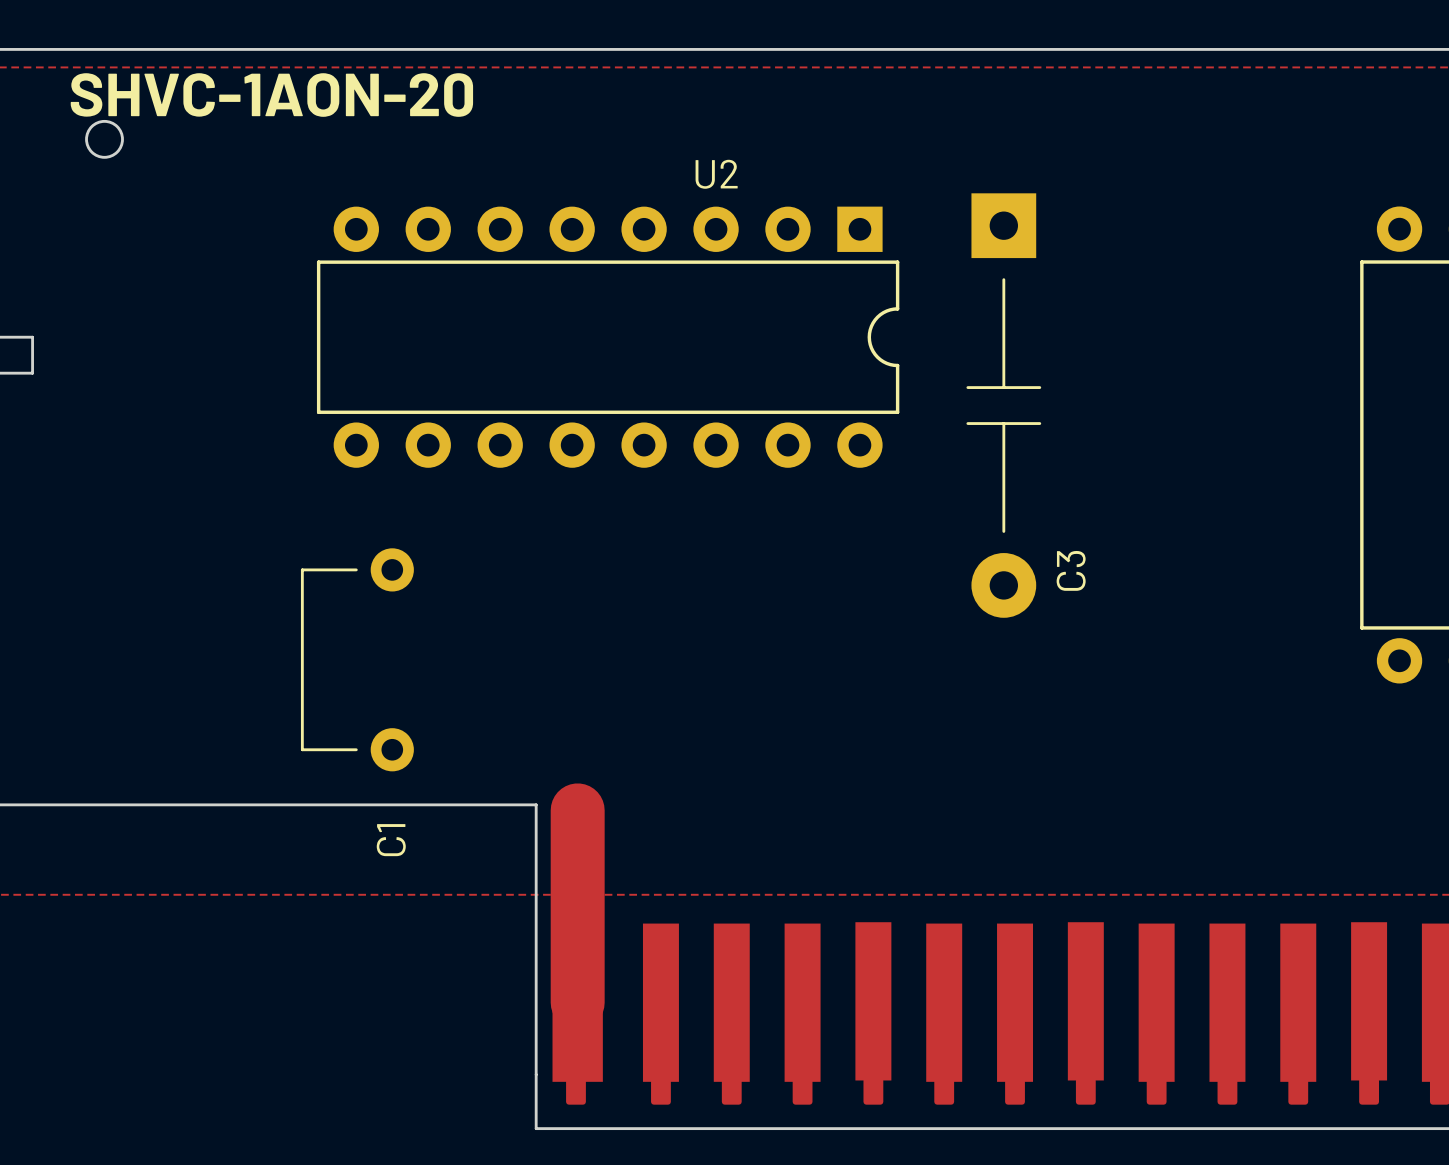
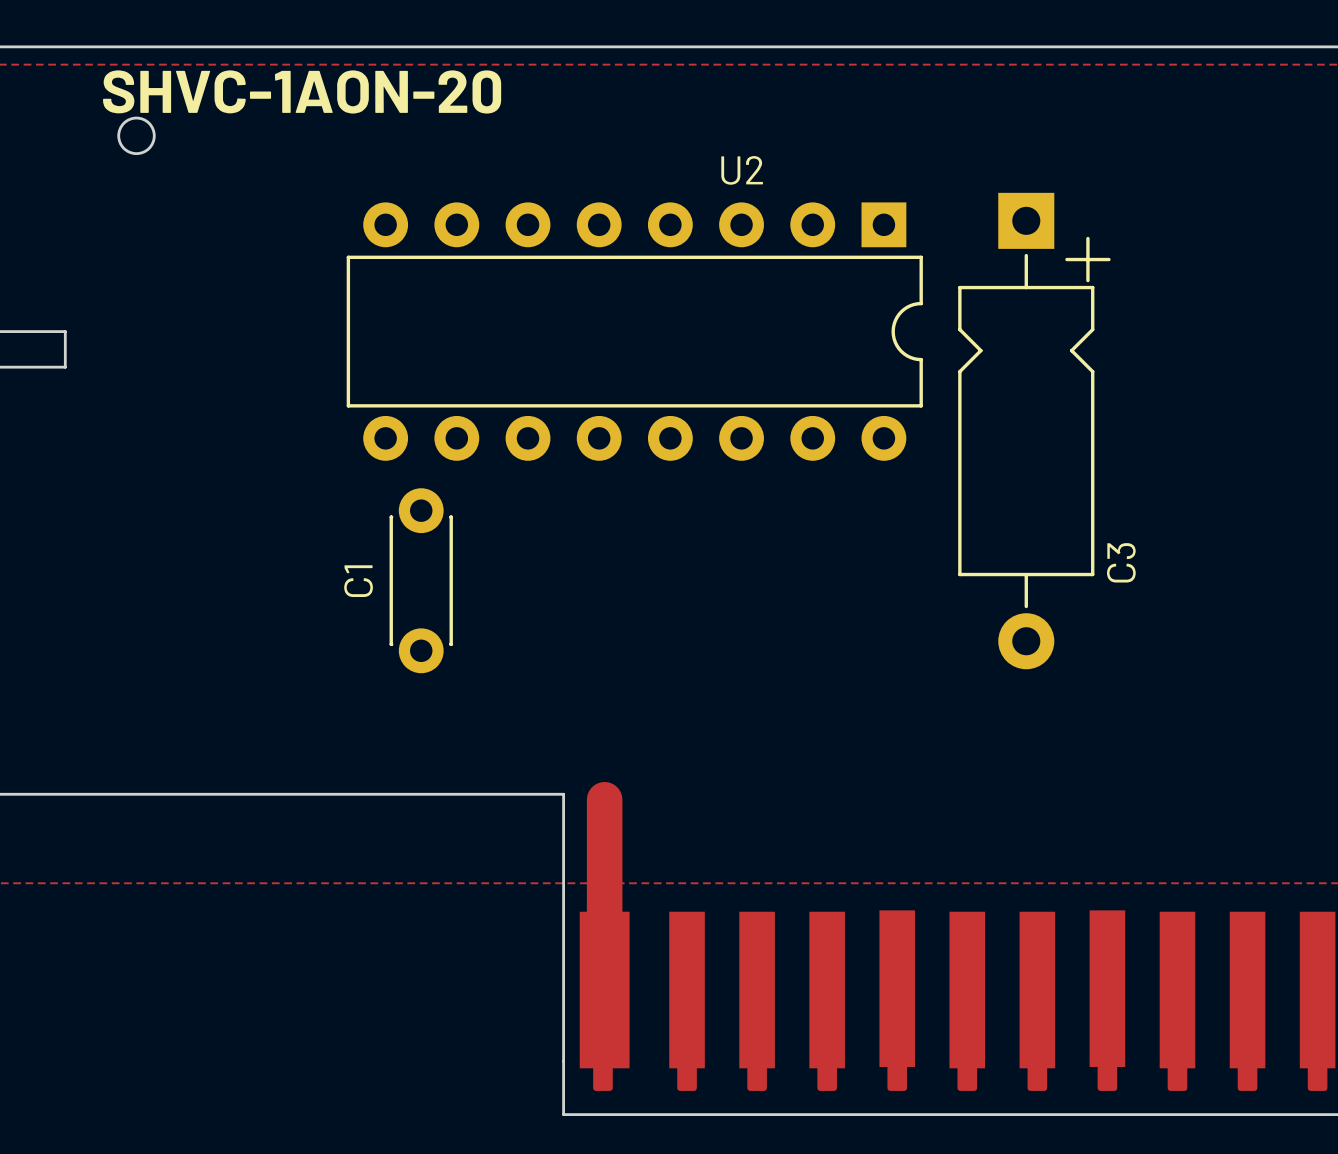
C3 footprint: [966, 193, 1042, 618] -> [958, 192, 1111, 670]
C1 footprint: [300, 548, 414, 772] -> [389, 488, 453, 674]
track width: thick (577, 810) (577, 1002) -> thin (604, 799) (604, 990)
C1 name position: C1 (391, 840) -> C1 (358, 581)

